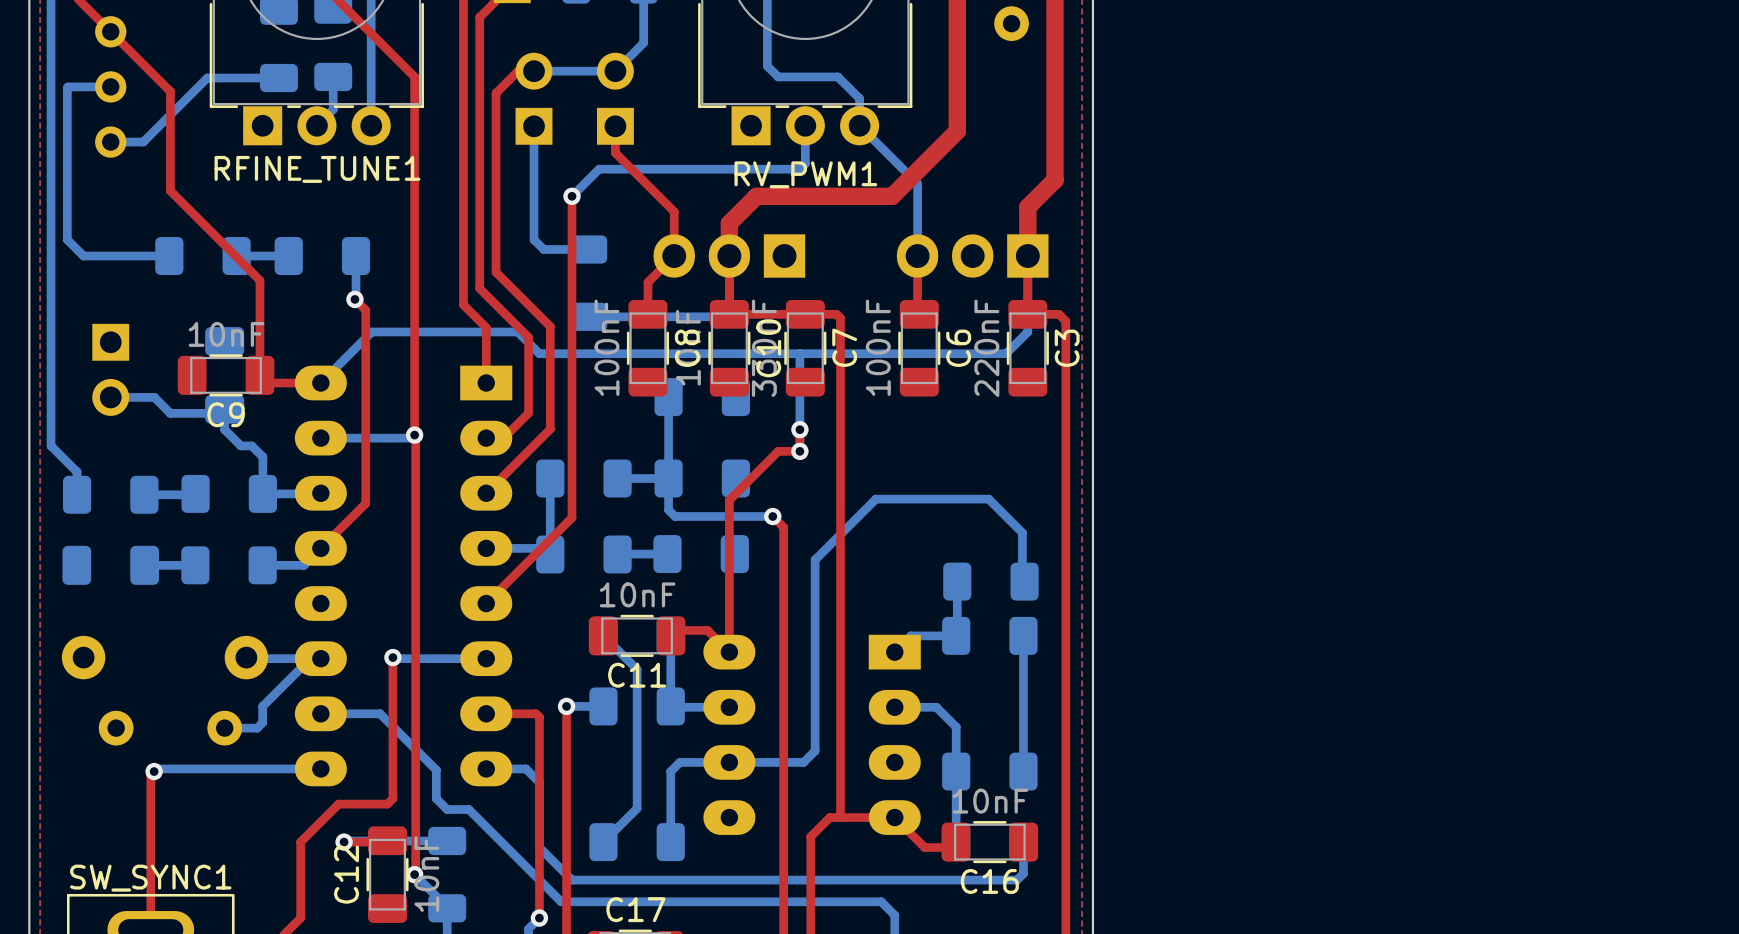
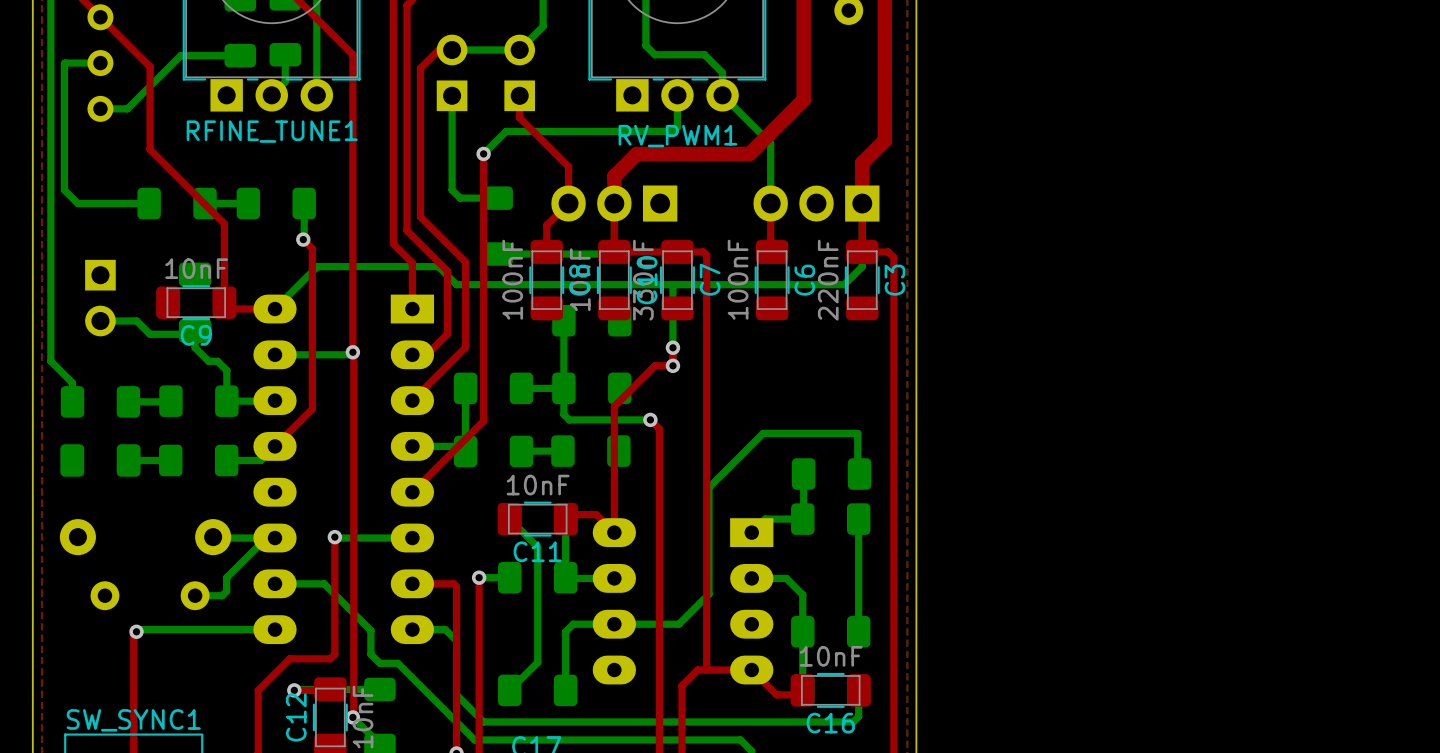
bottom track: (1022, 532) (988, 499) (875, 499) (815, 559) (815, 750) (803, 762) -> (857, 433) (763, 433) (709, 487) (709, 594) (678, 624) (676, 624)

